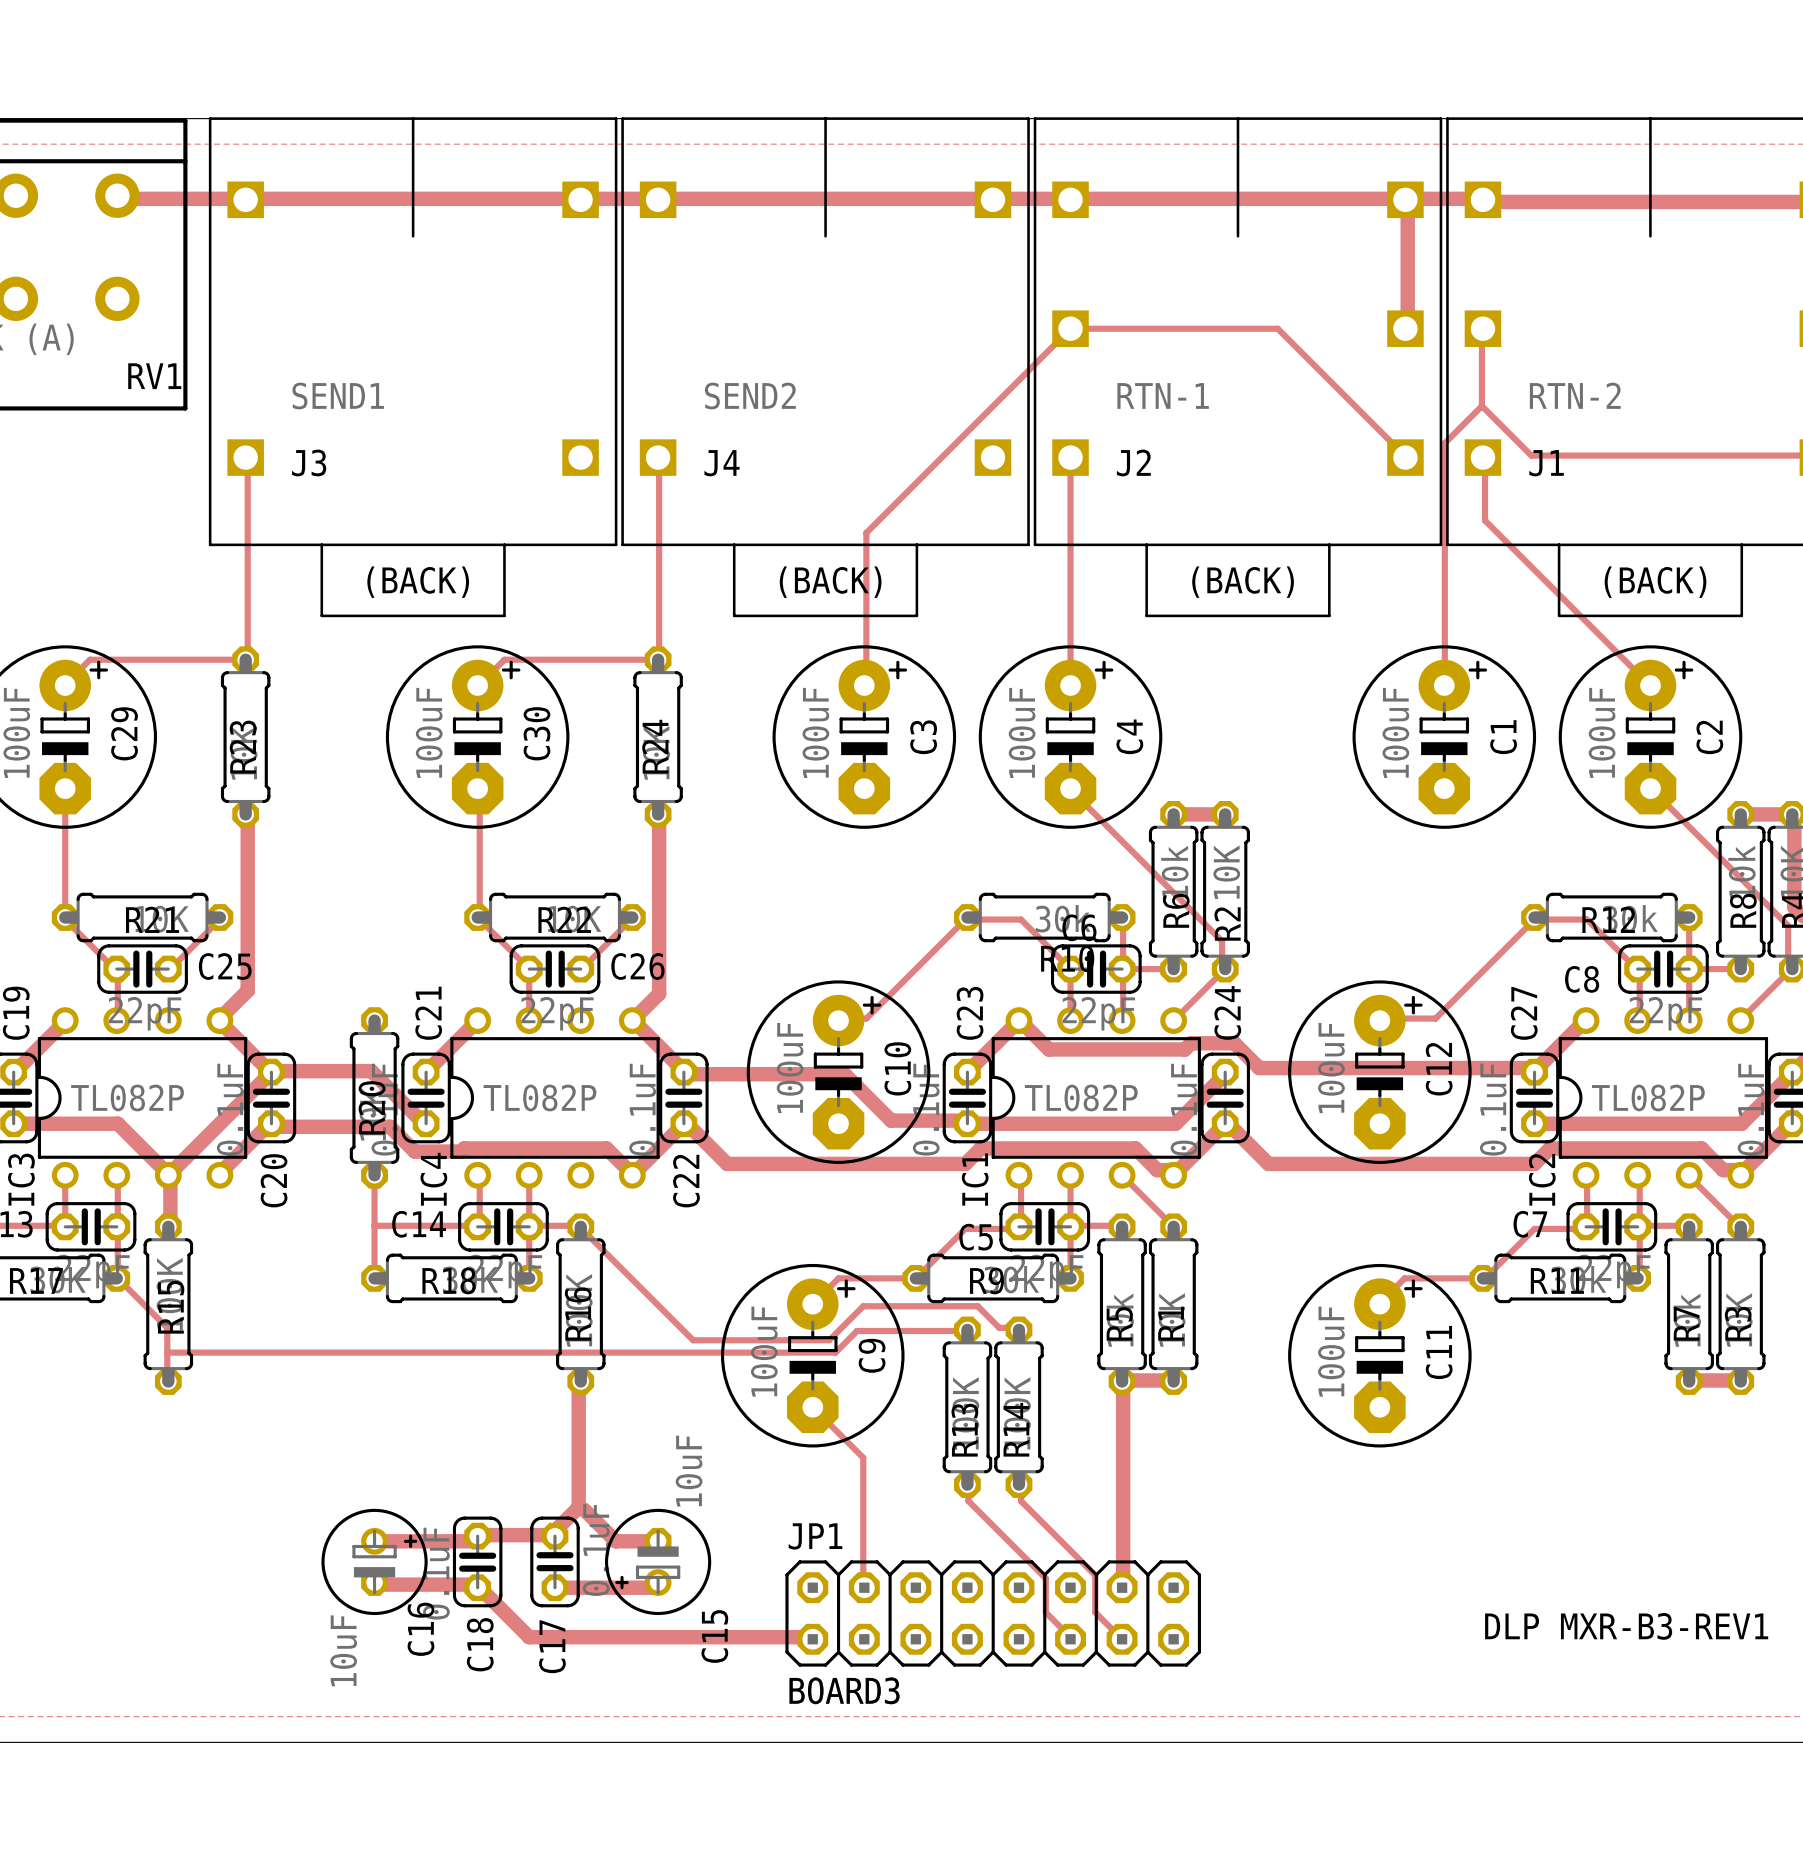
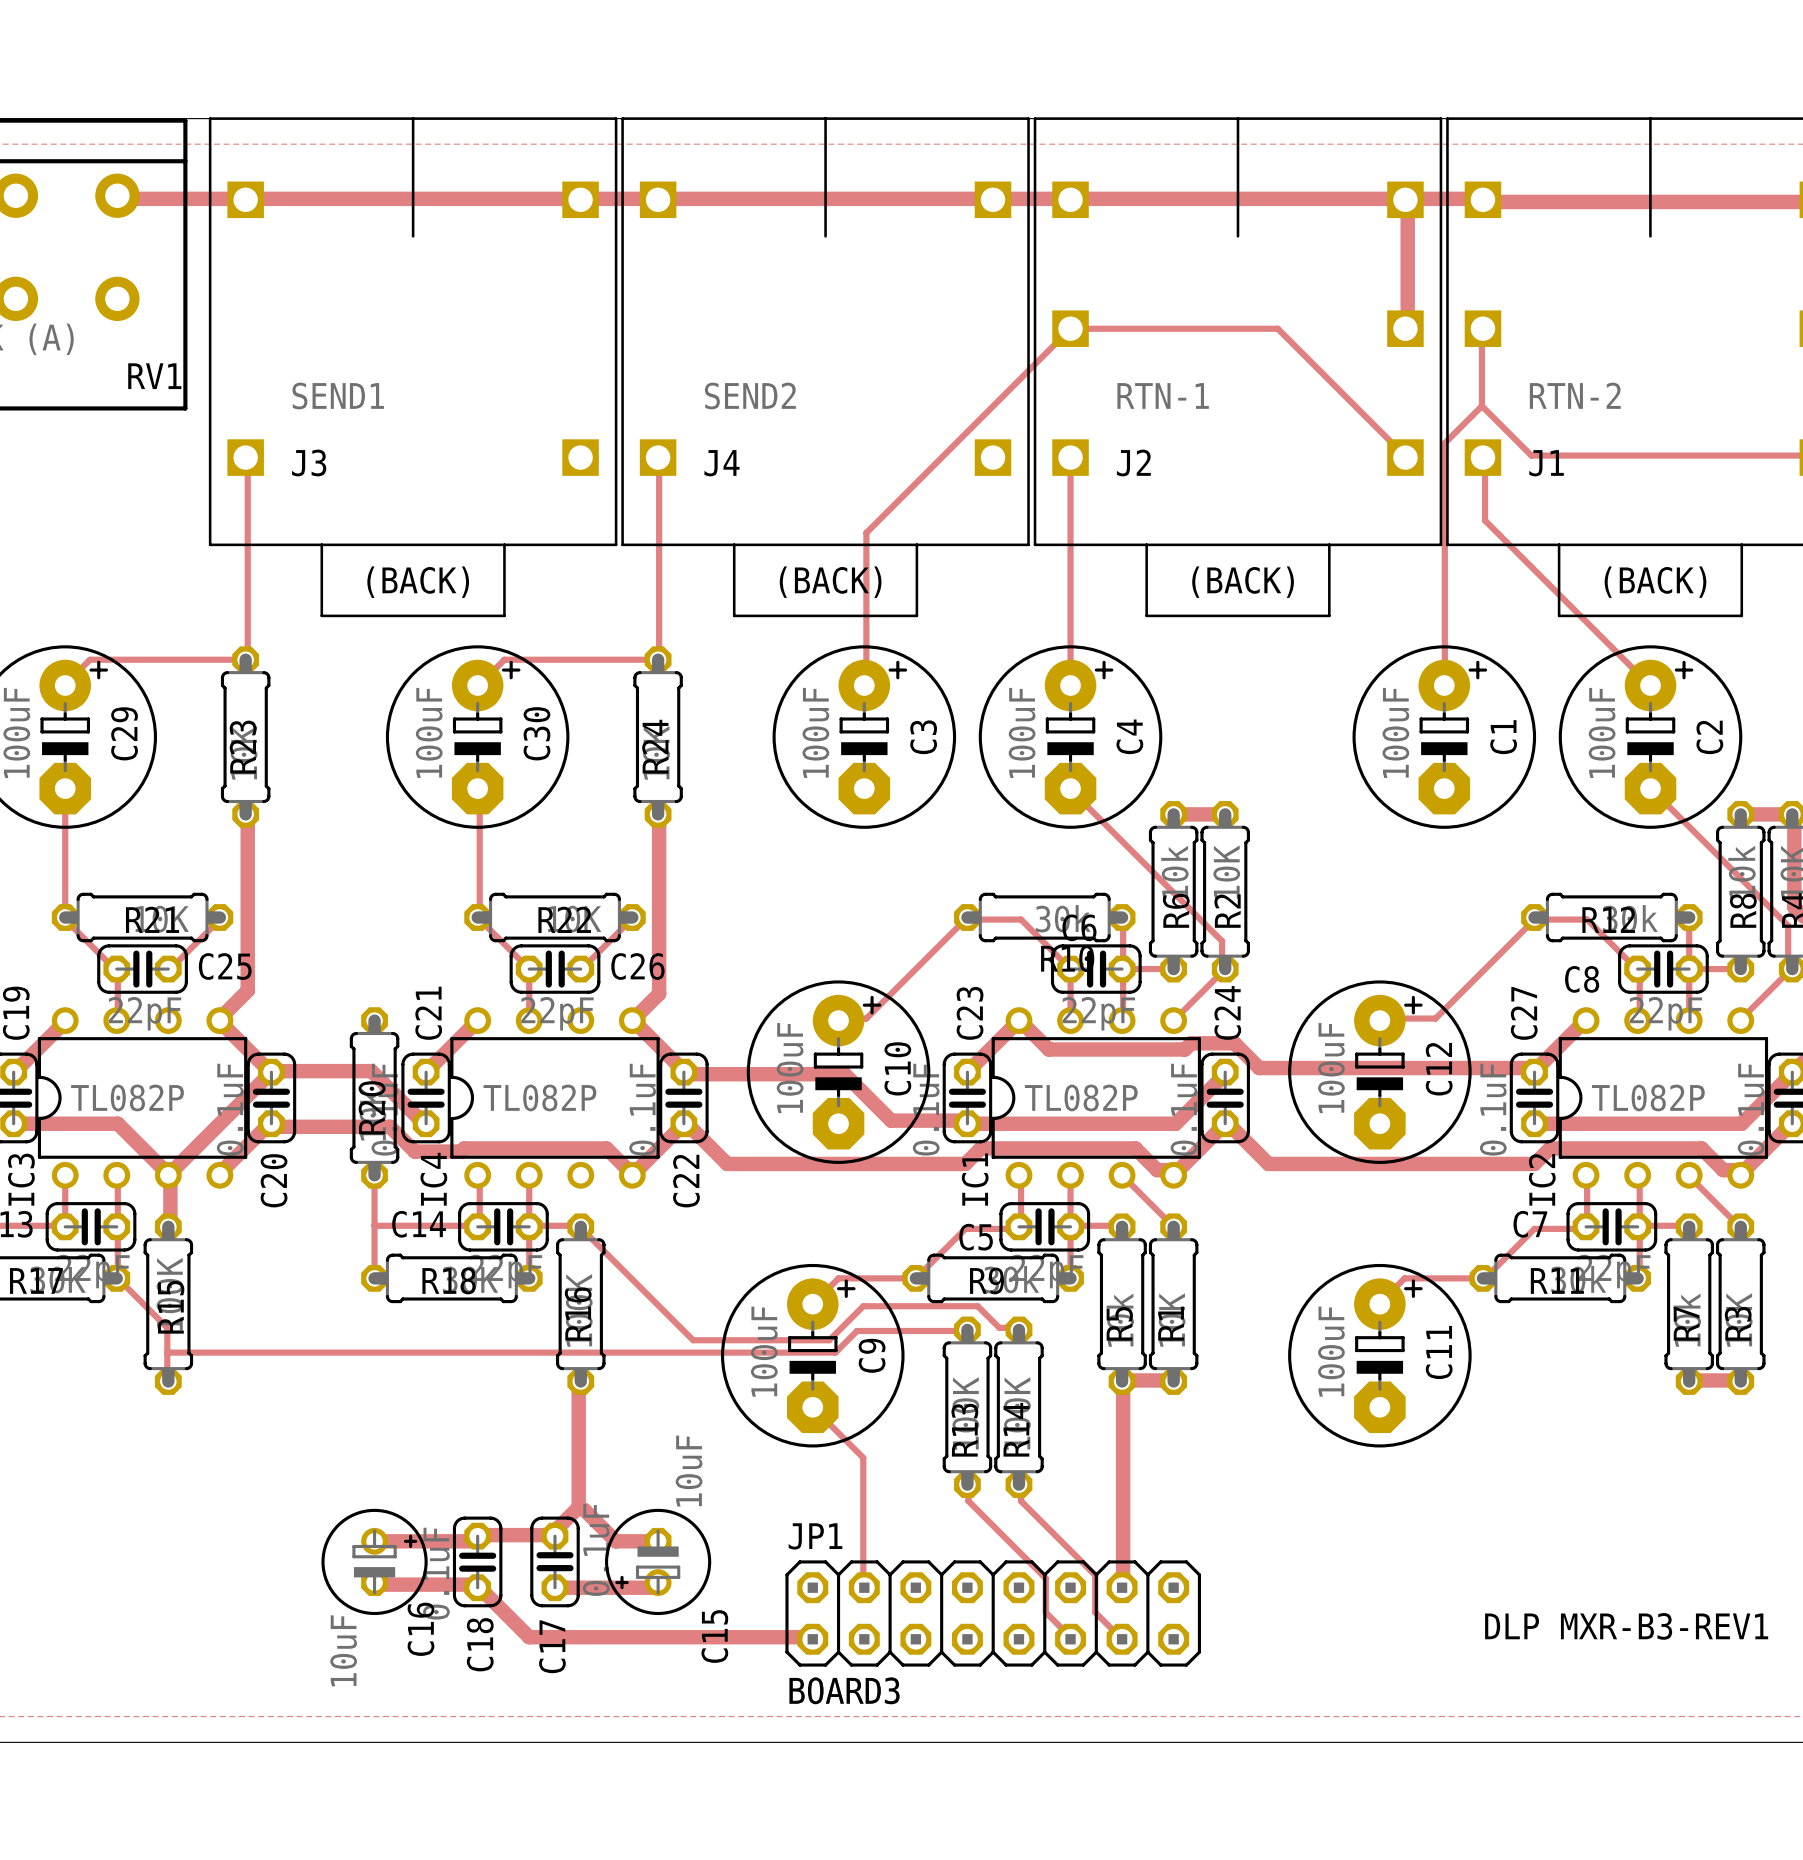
R2 name position: R2 (1227, 924) -> R2 (1227, 911)

